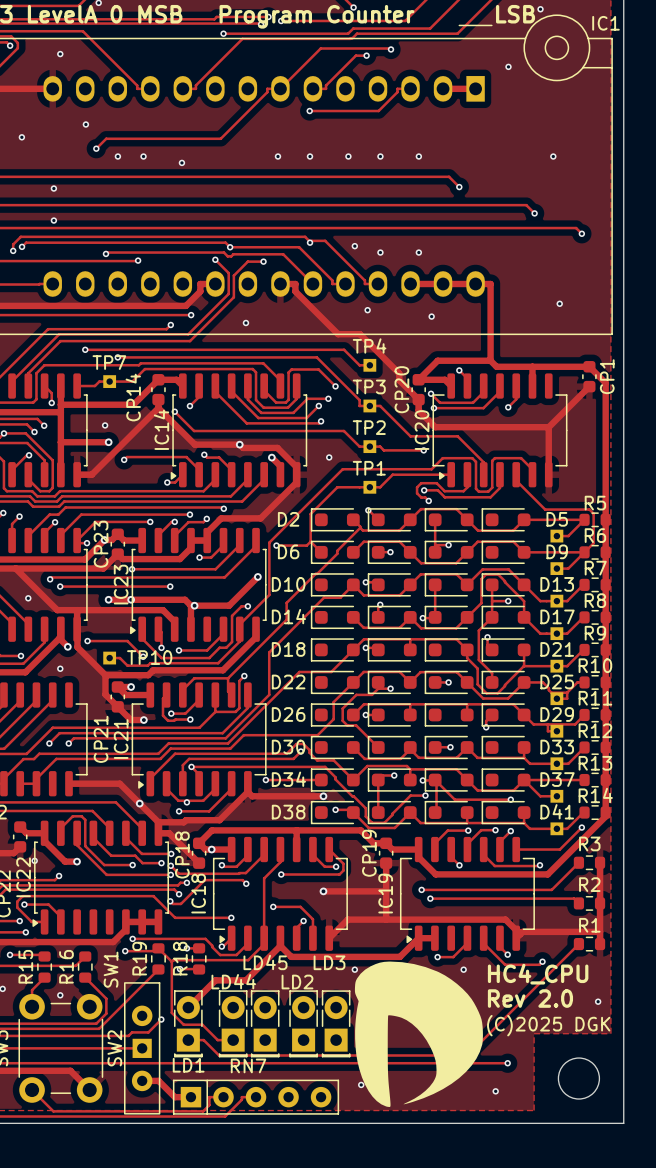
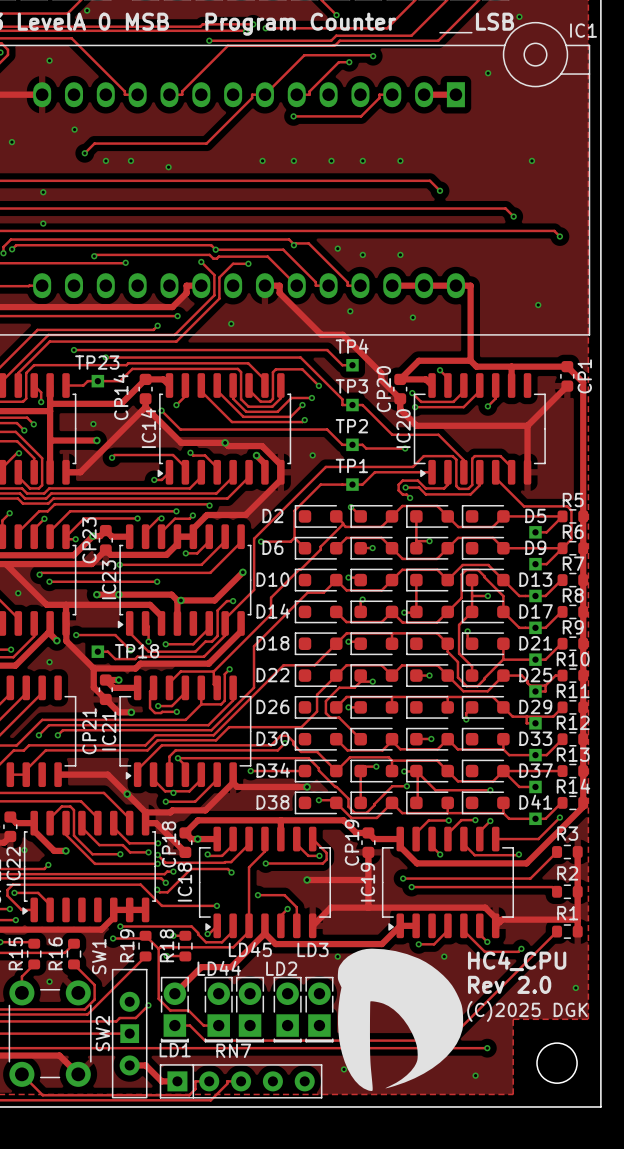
TP7 name: TP7 (109, 362) -> TP23 (97, 362)
TP10 name: TP10 (149, 657) -> TP18 (137, 651)

